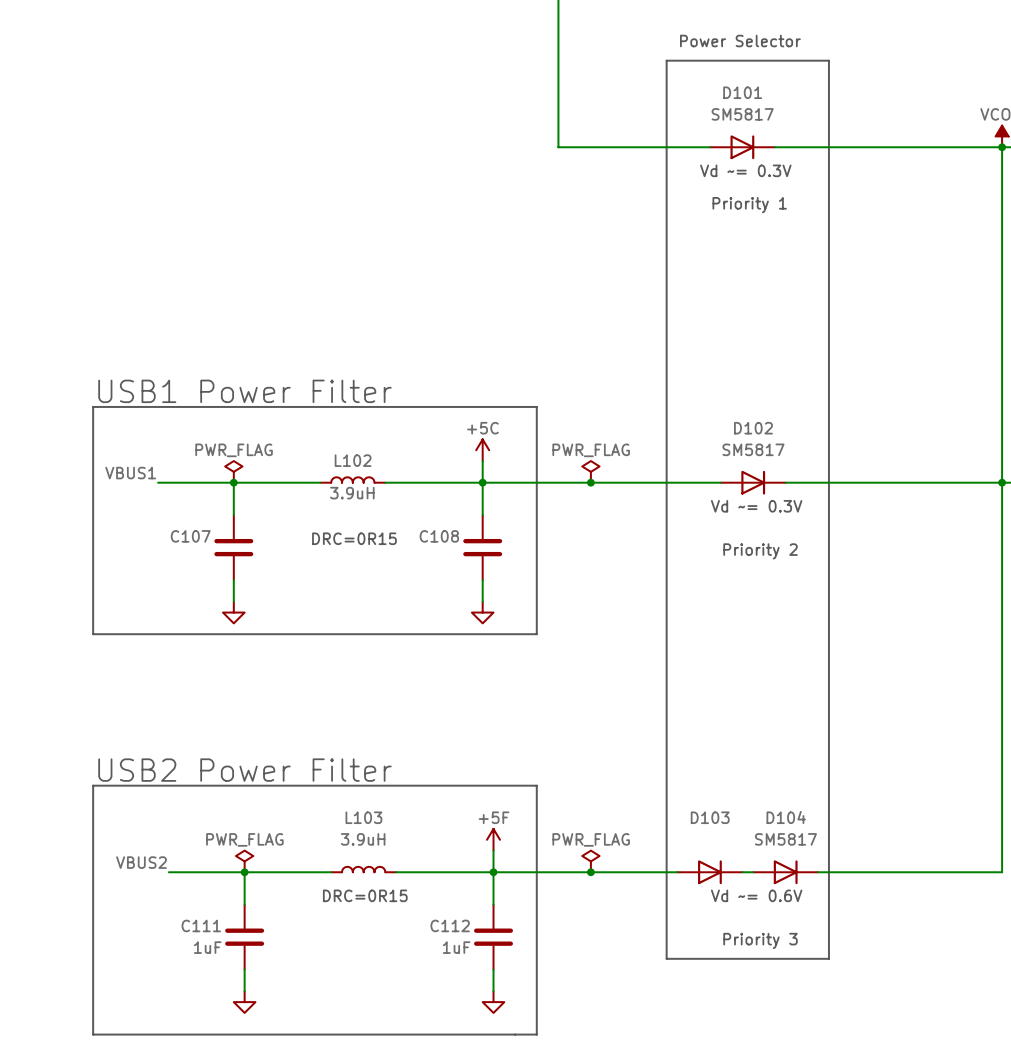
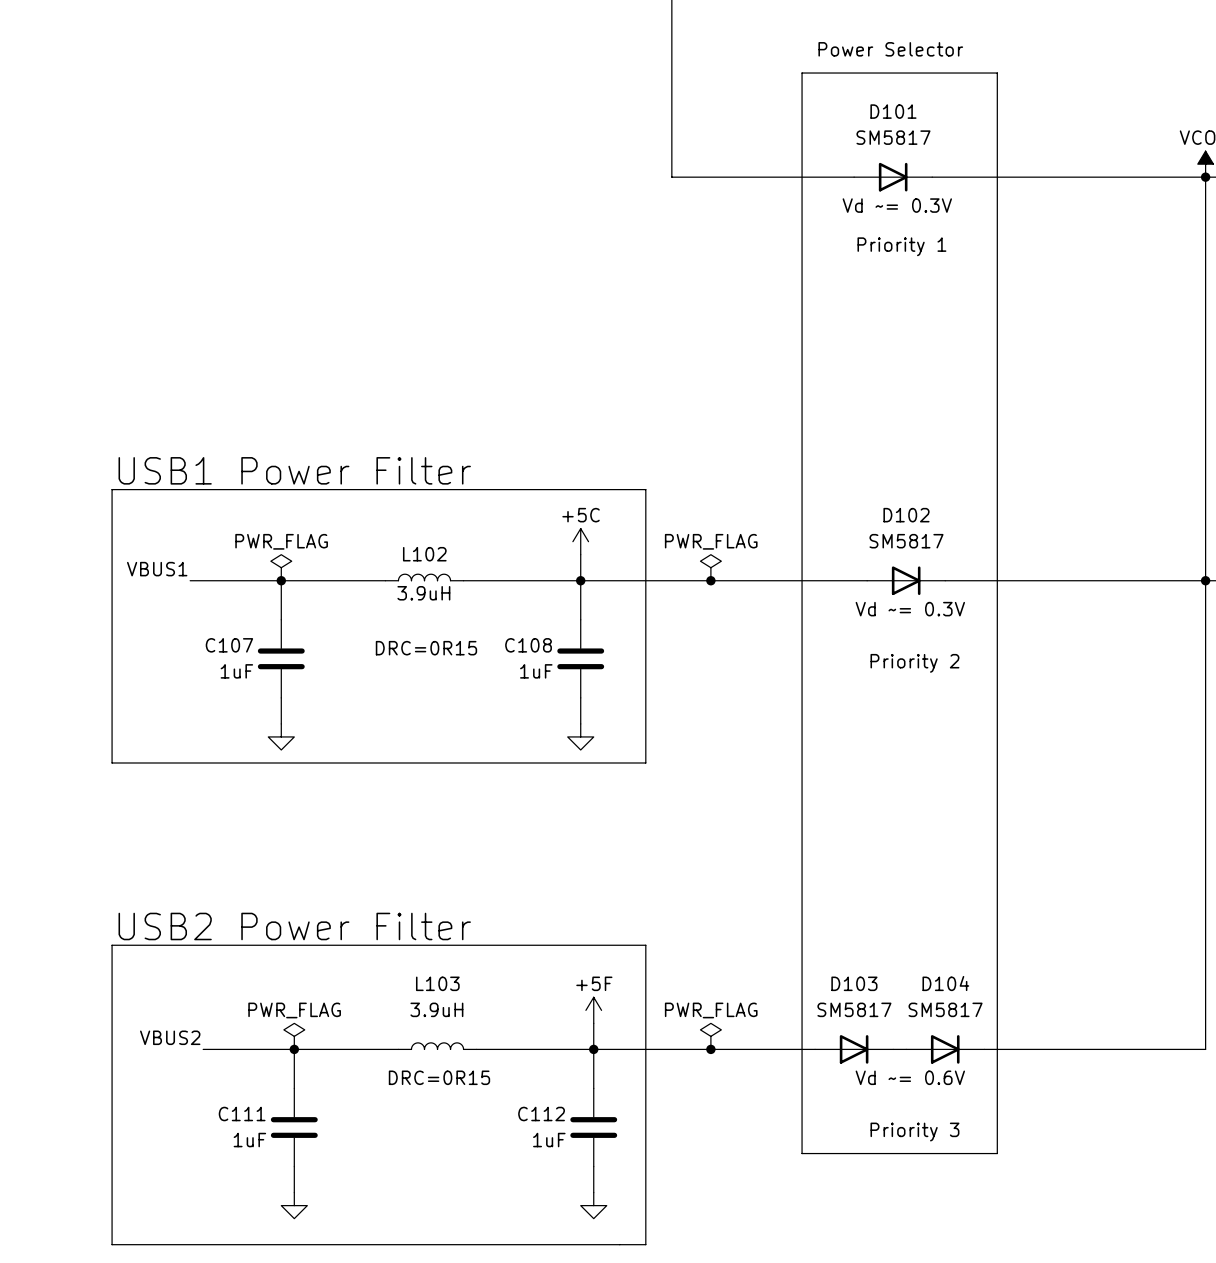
C107 value: none -> 1uF (236, 671)
C108 value: none -> 1uF (536, 671)
D103 value: none -> SM5817 (854, 1009)

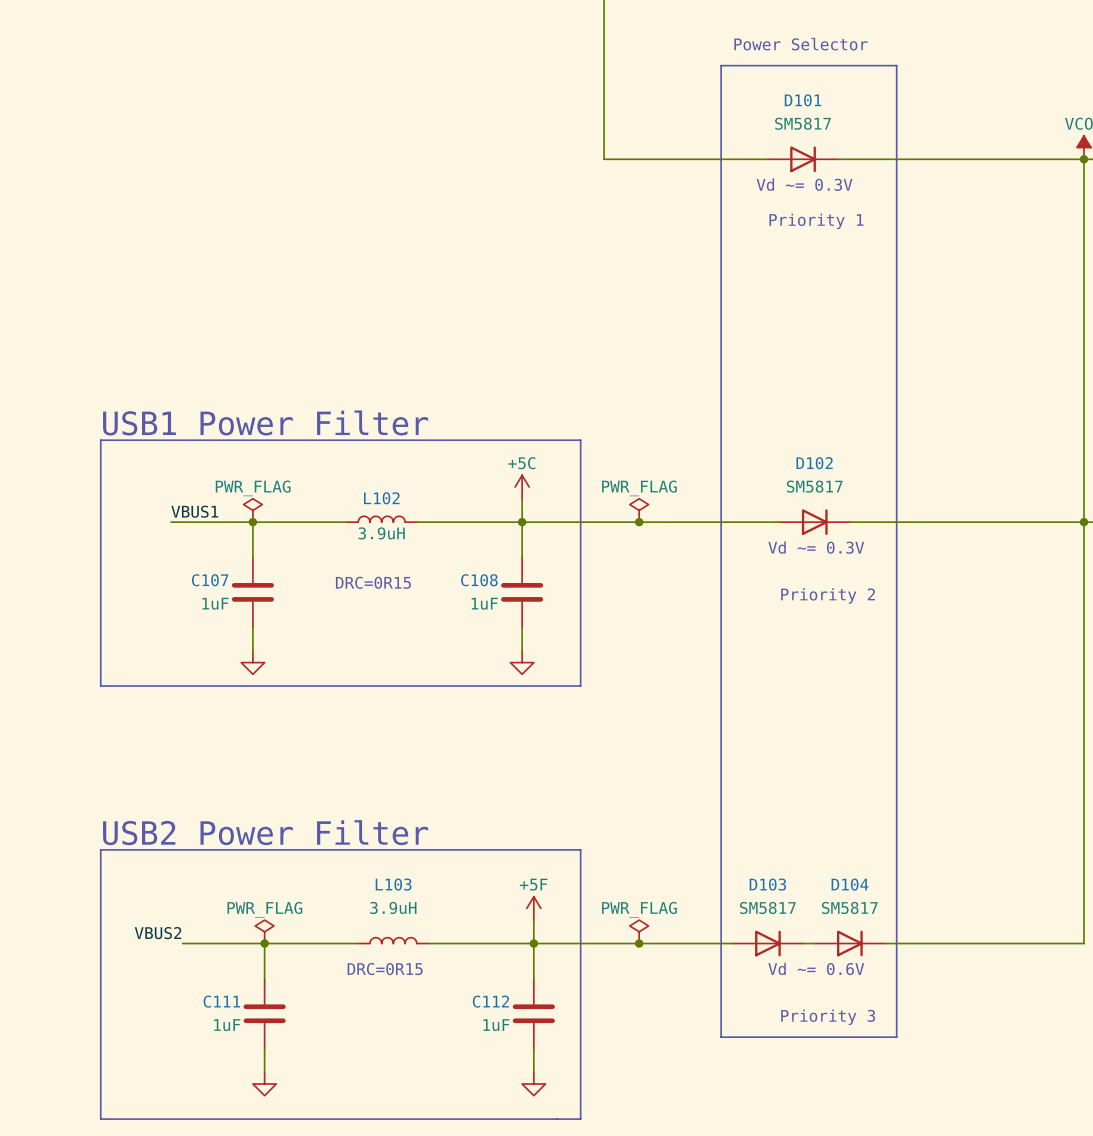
label position: VBUS1 (157, 569) -> VBUS1 (194, 511)

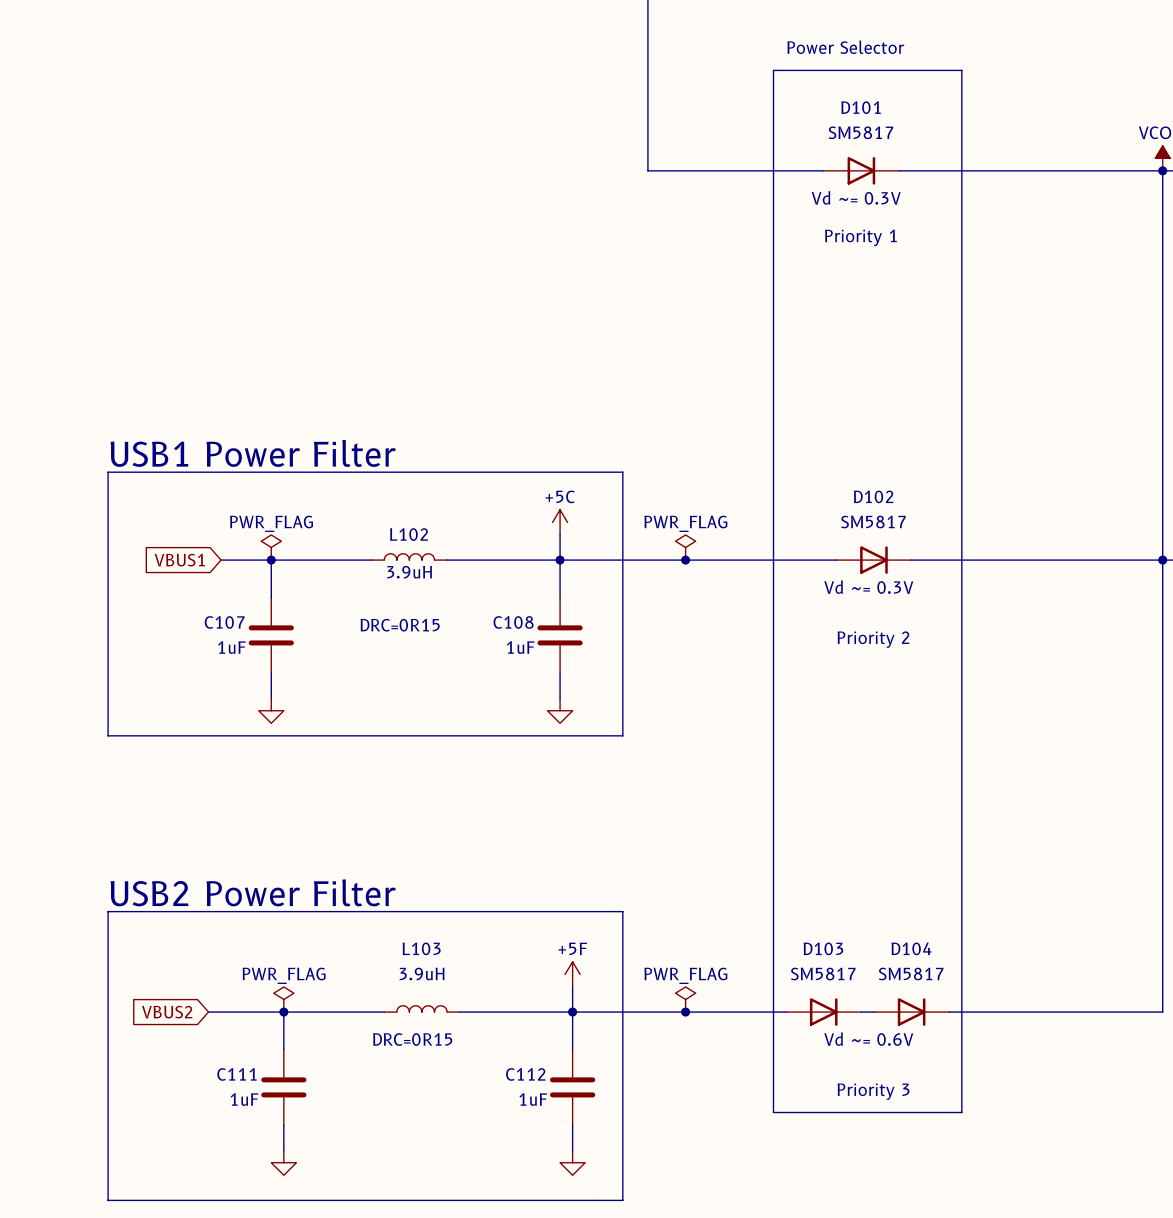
label: VBUS1 (194, 511) -> none
global label: none -> VBUS1 (179, 560)
wire: (170, 522) (206, 522) -> none
label: VBUS2 (158, 933) -> none
global label: none -> VBUS2 (167, 1012)
wire: (182, 943) (194, 943) -> none

